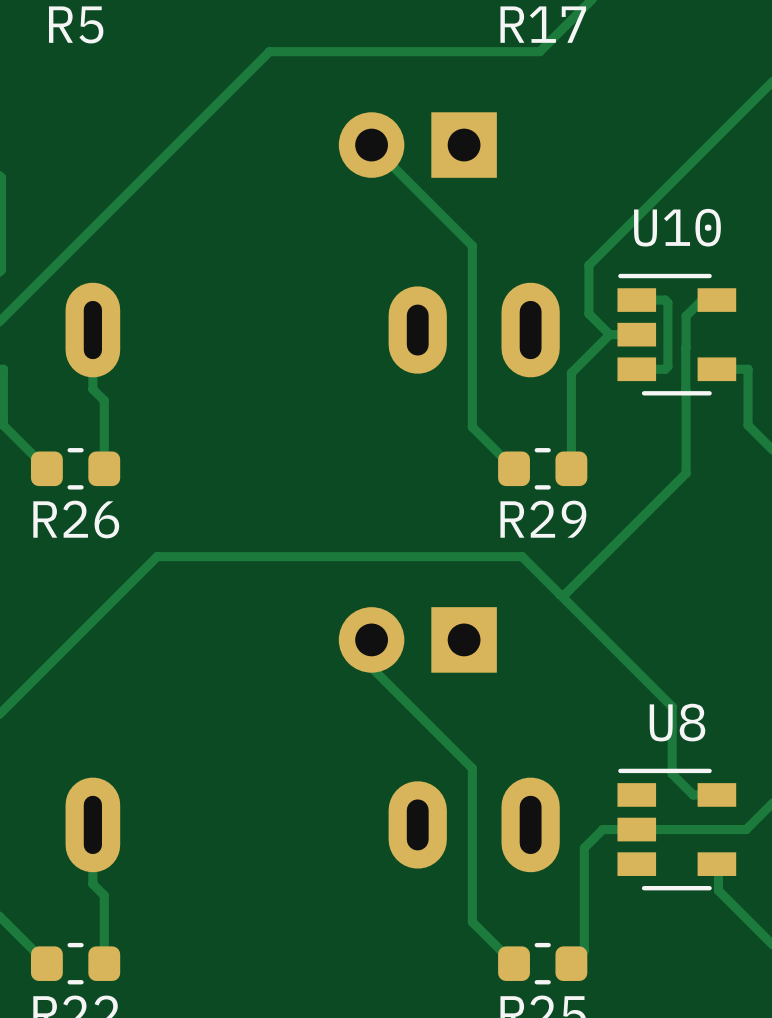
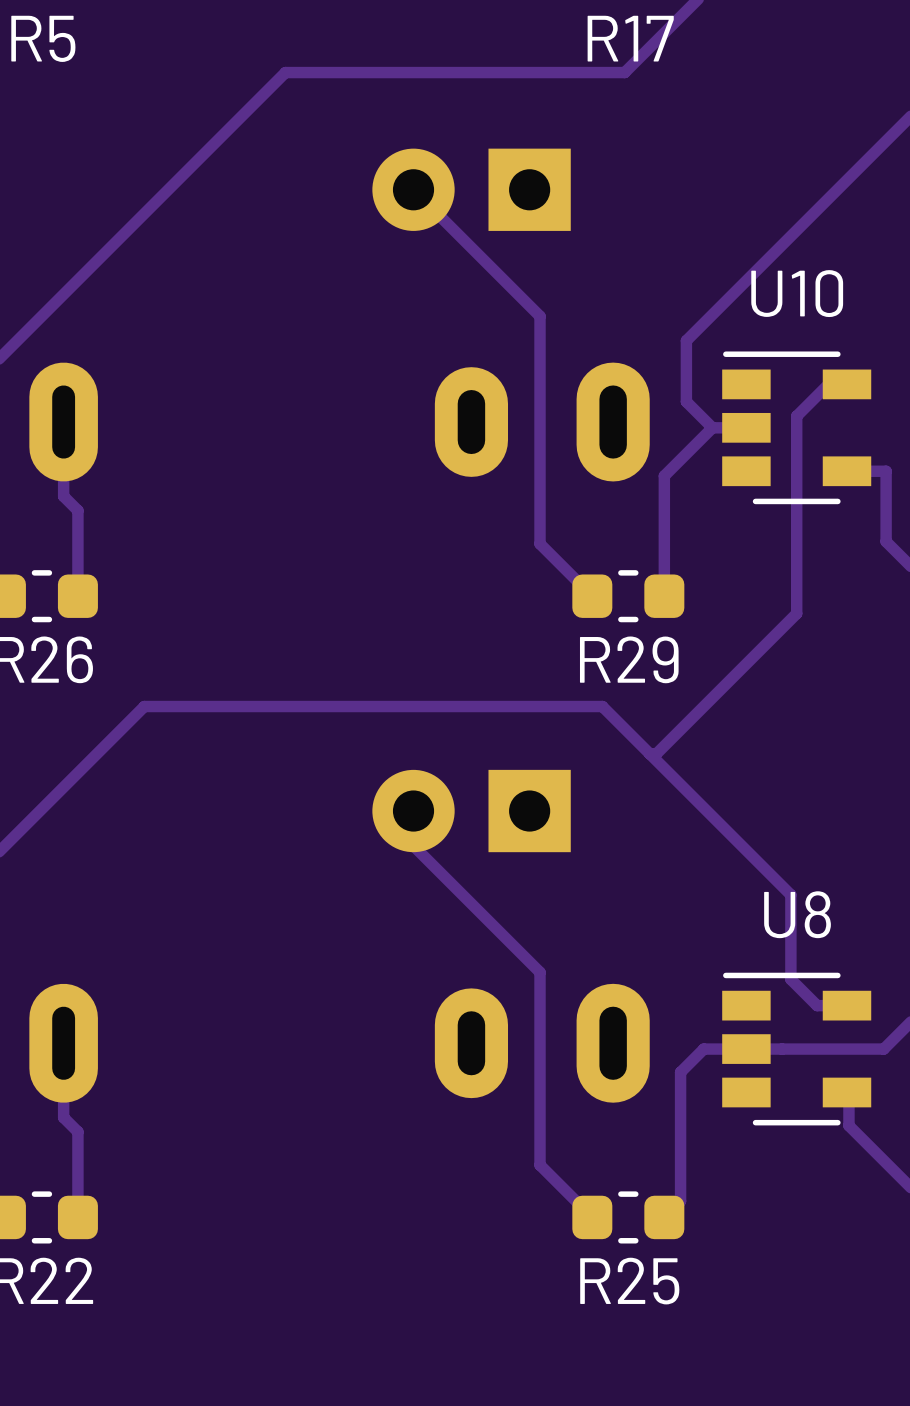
track: (636, 300) (665, 300) (667, 302) (667, 366) (665, 369) (636, 369) -> none
track: (686, 316) (686, 347) -> none
track: (685, 347) (685, 390) -> none
track: (686, 390) (686, 473) (676, 482) -> (808, 404) (796, 416) (796, 613)

